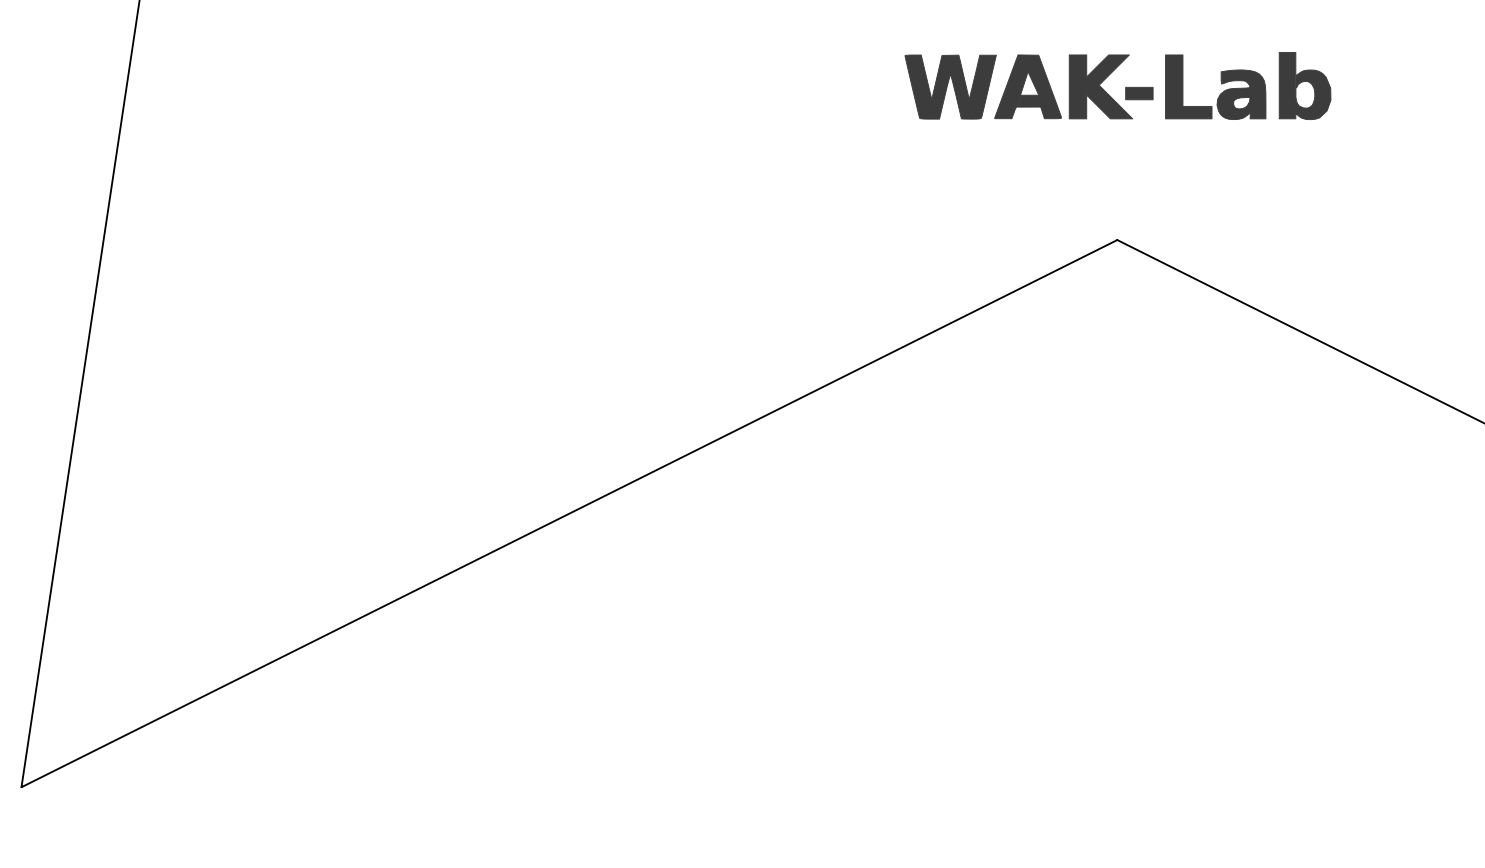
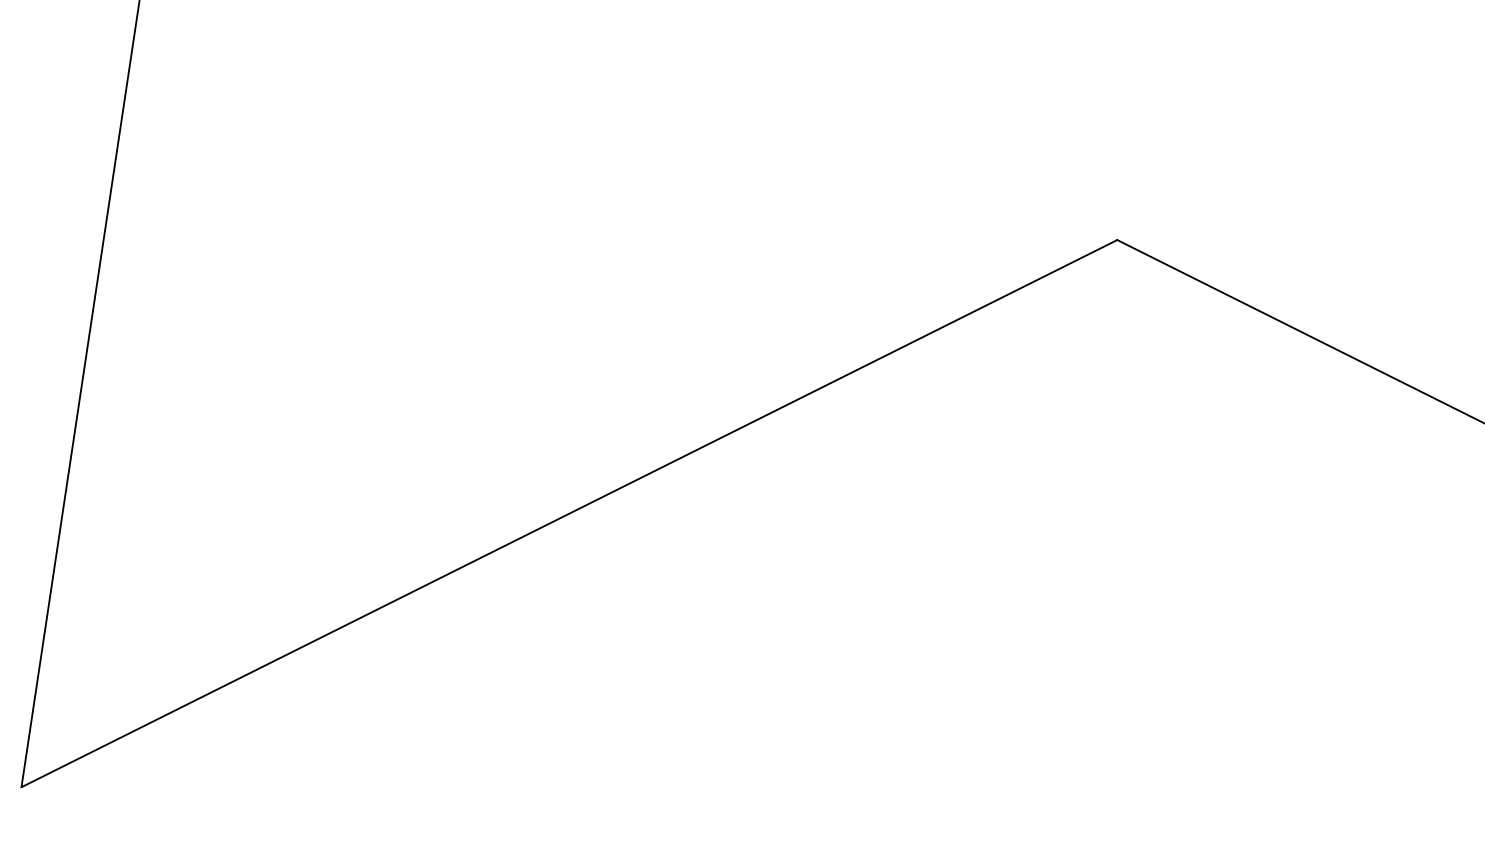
drawing: [904, 51, 1332, 121] -> none

